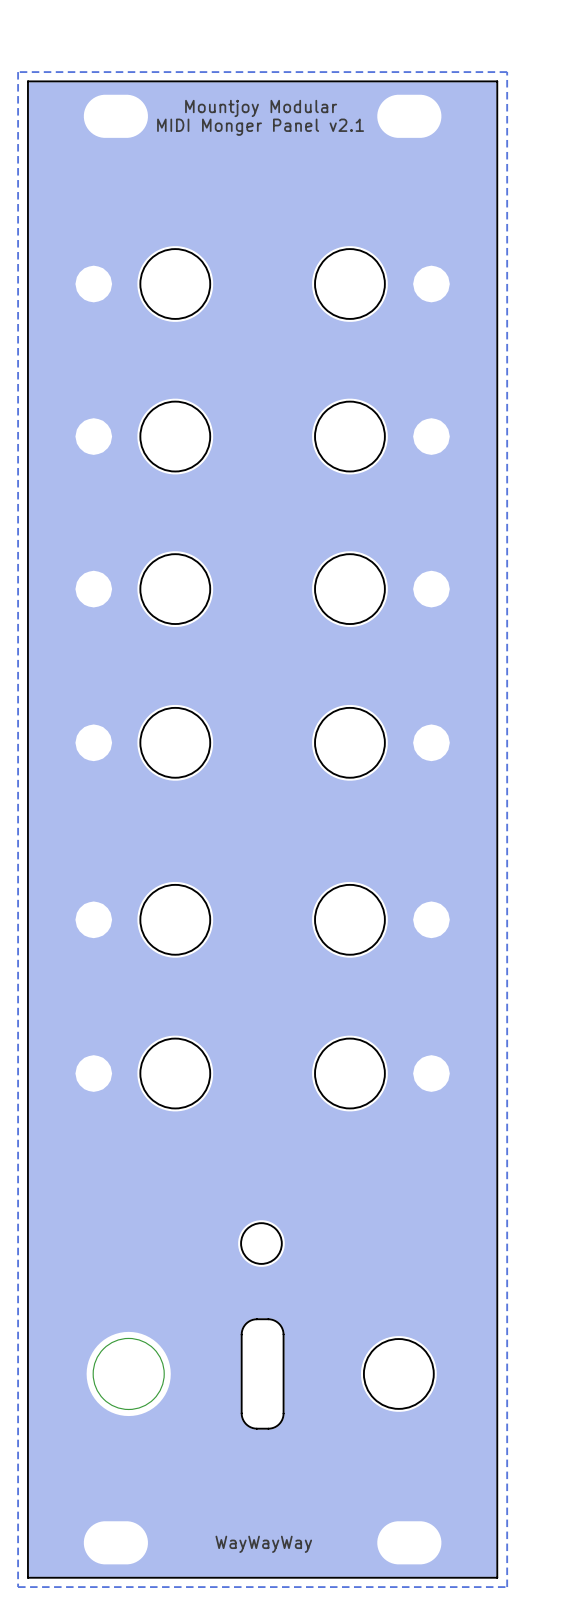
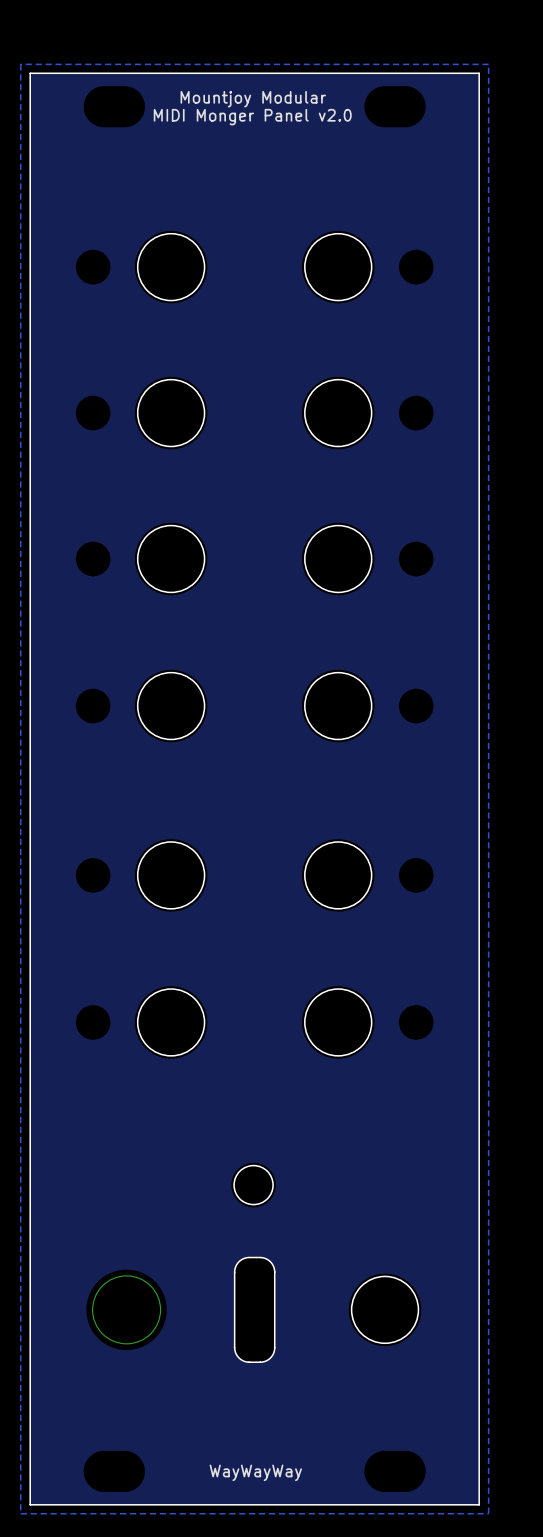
text: MIDI Monger Panel v2.1 (260, 127) -> MIDI Monger Panel v2.0 (252, 117)

